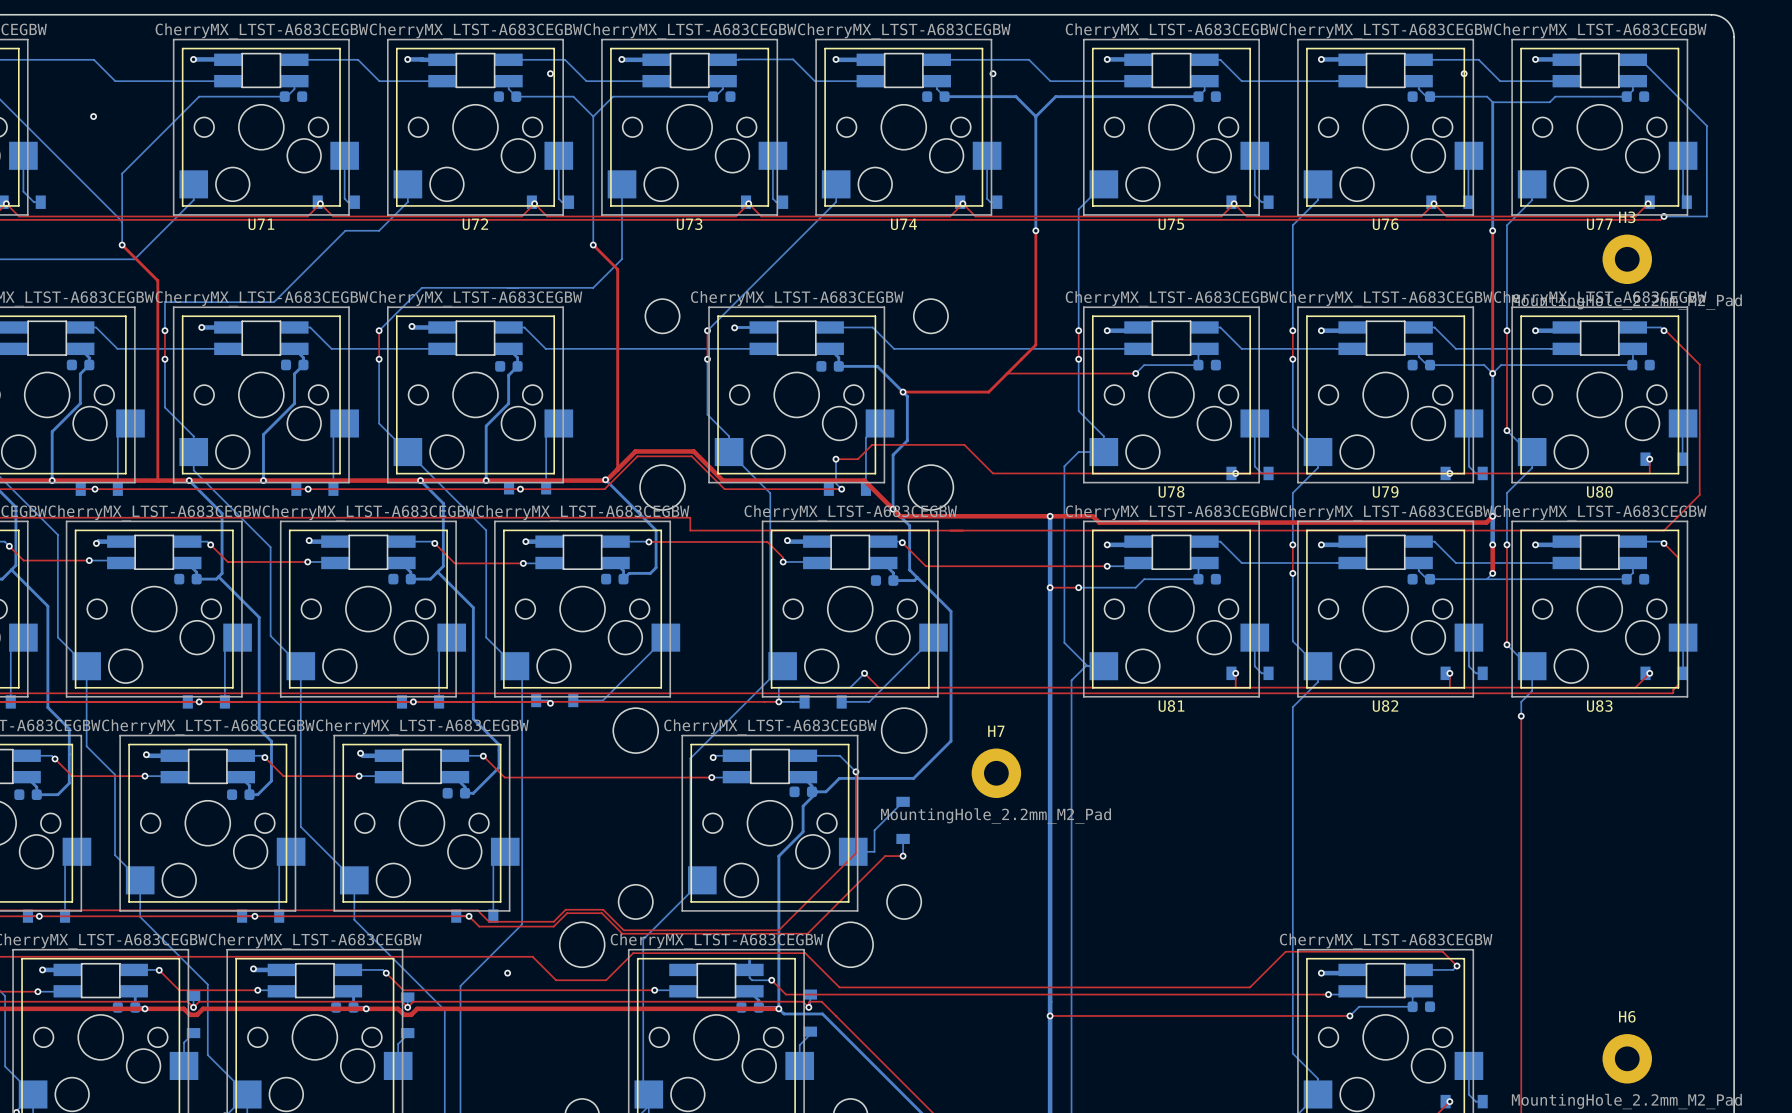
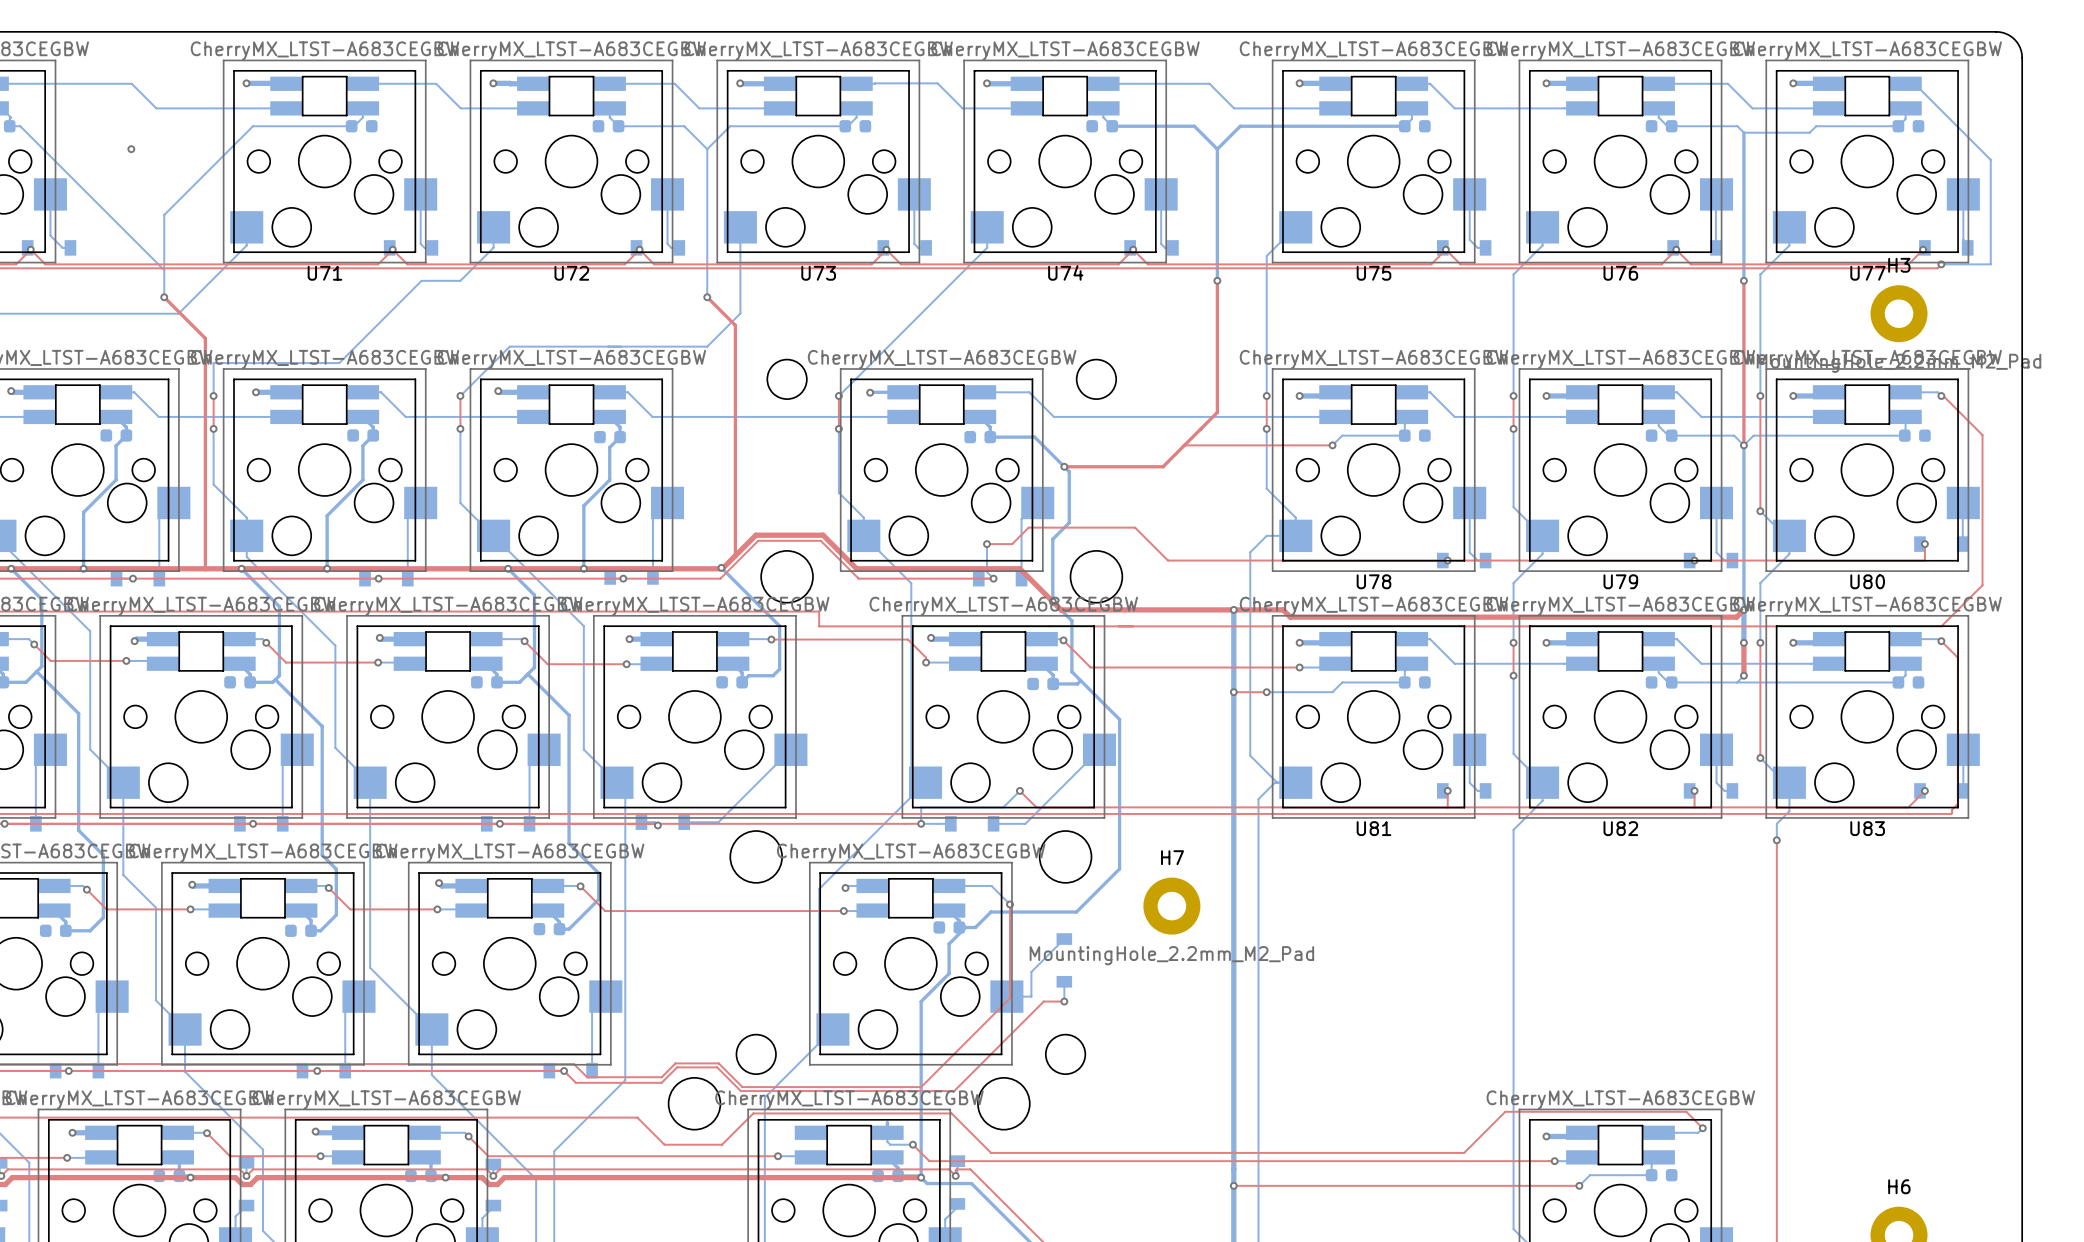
via: (550, 73) -> none
via: (993, 73) -> none
via: (1464, 73) -> none
via: (507, 973) -> none

